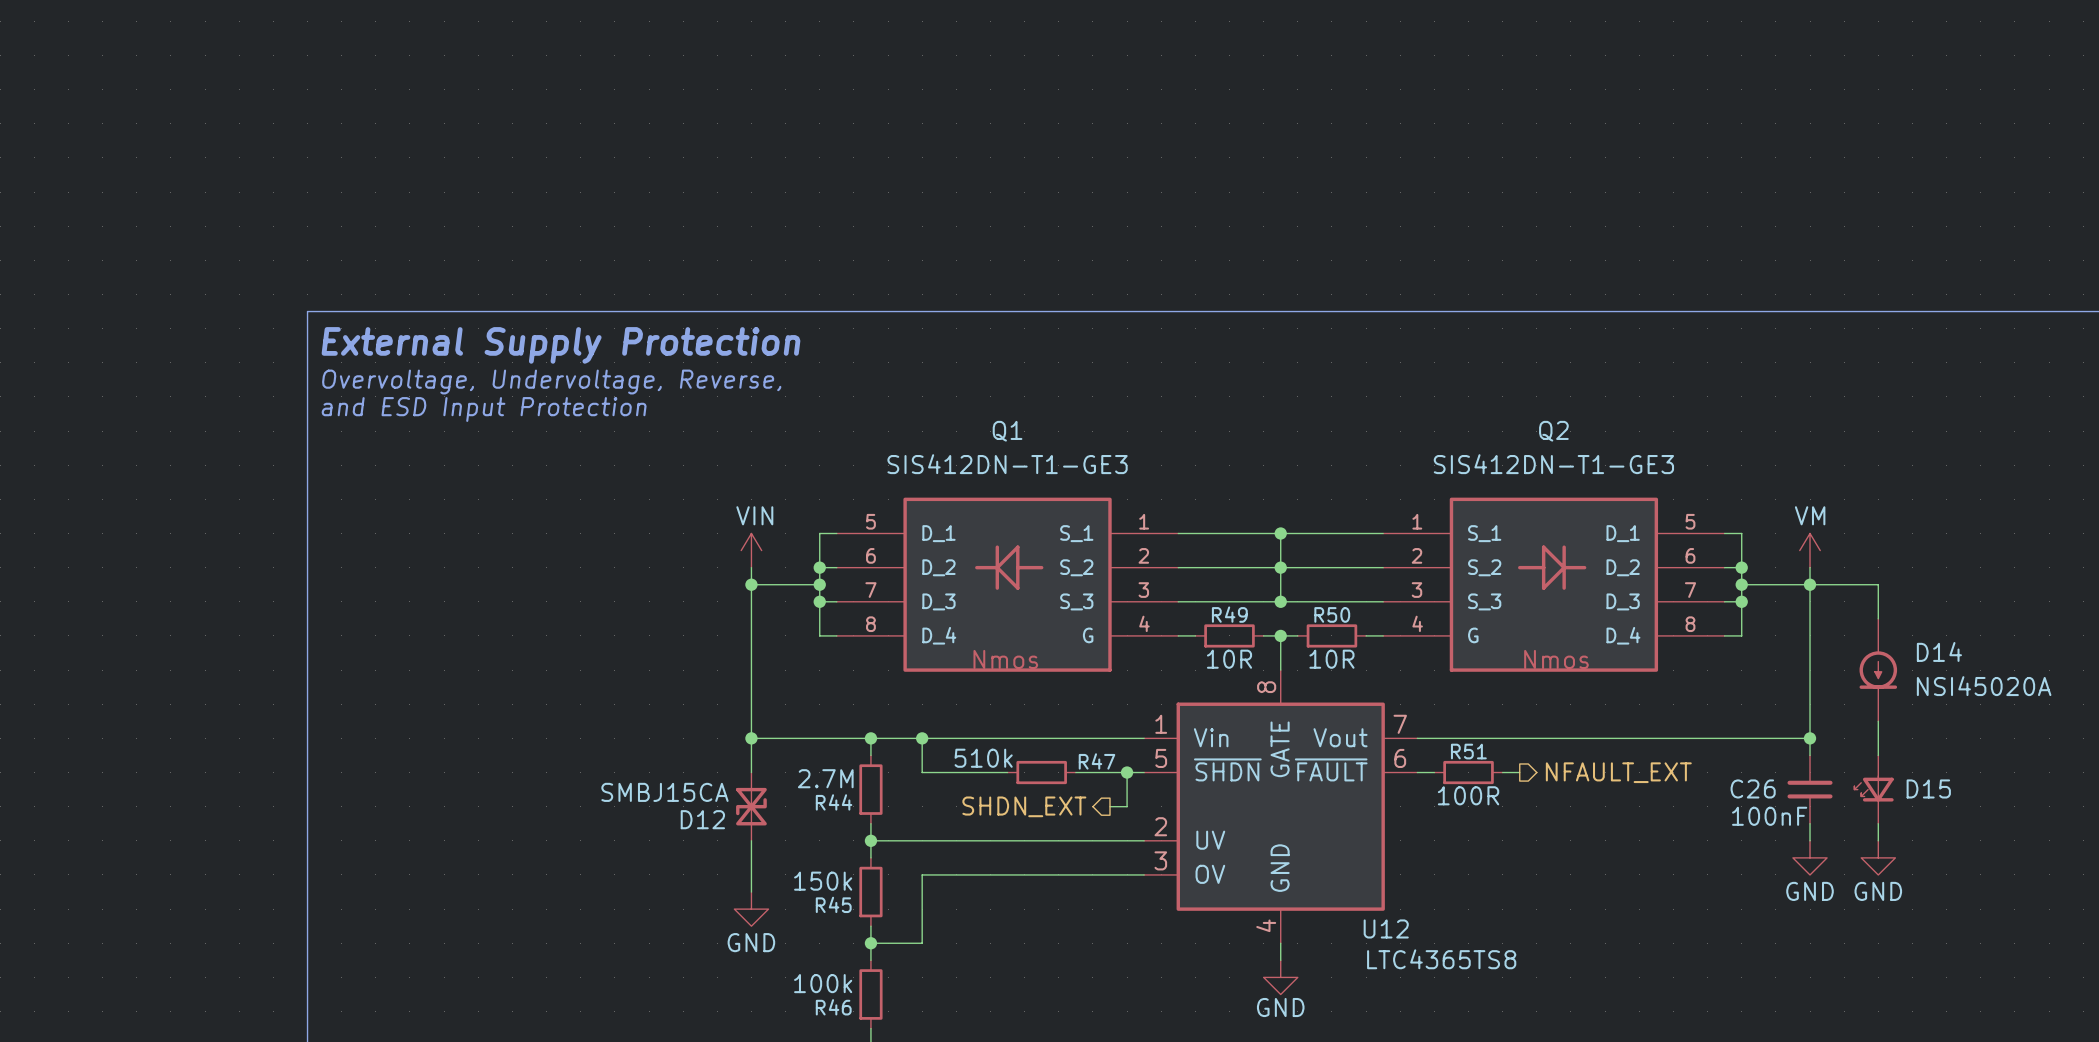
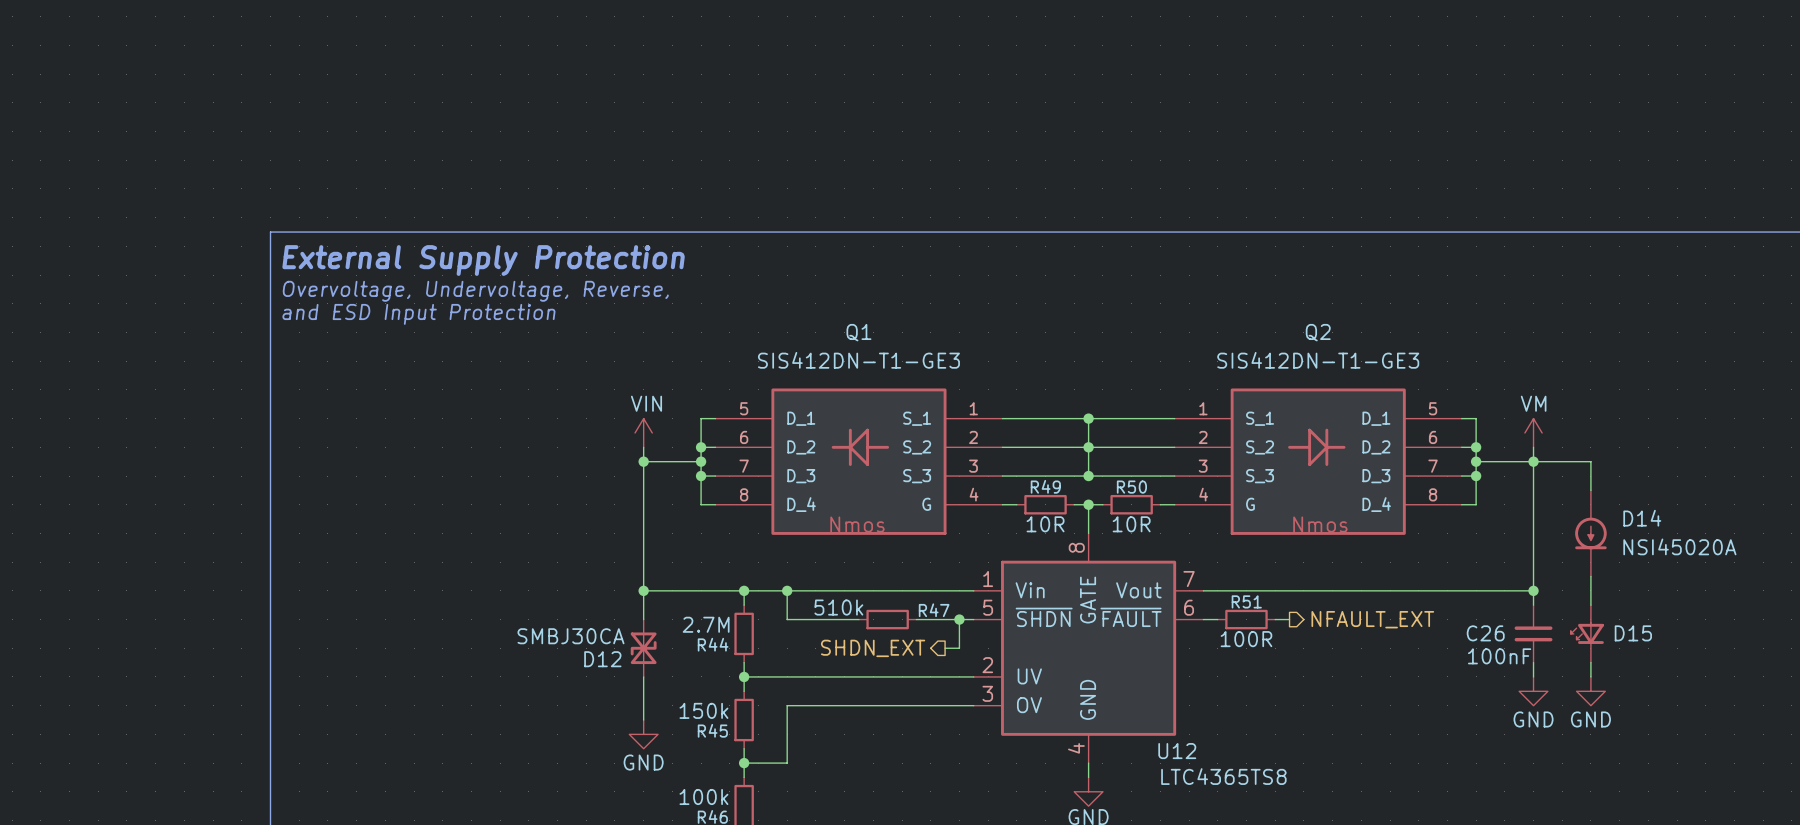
D12 value: SMBJ15CA (664, 792) -> SMBJ30CA (570, 636)

